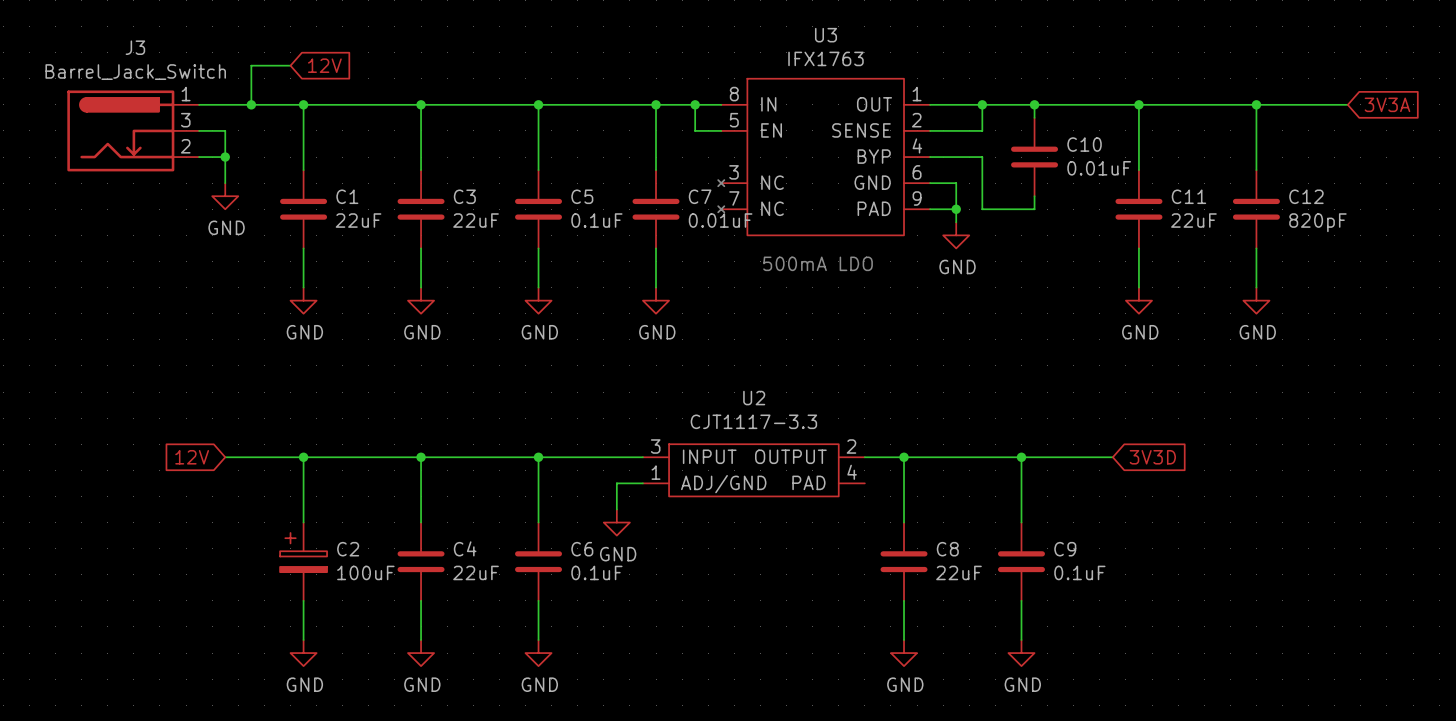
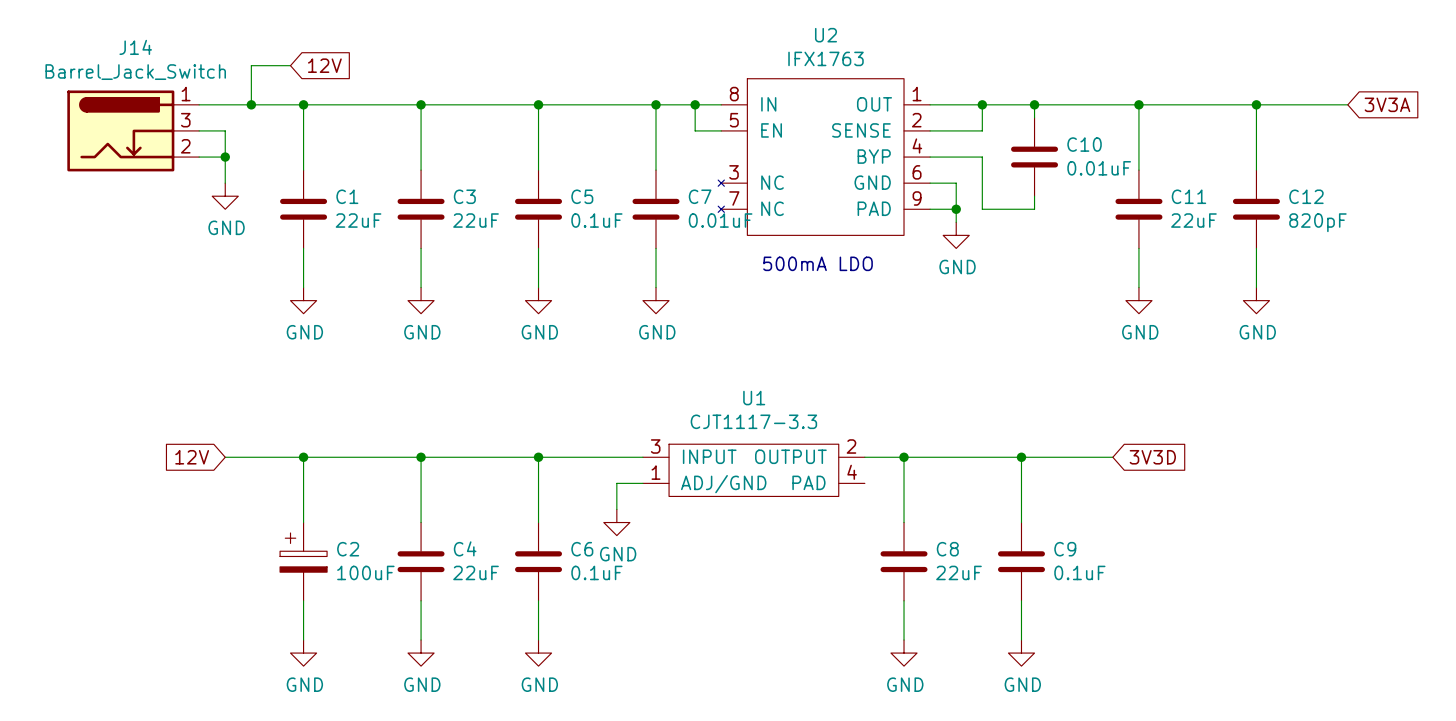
U3 name: U3 (826, 35) -> U2 (826, 35)
J3 name: J3 (135, 47) -> J14 (135, 47)
U2 name: U2 (754, 398) -> U1 (754, 398)

